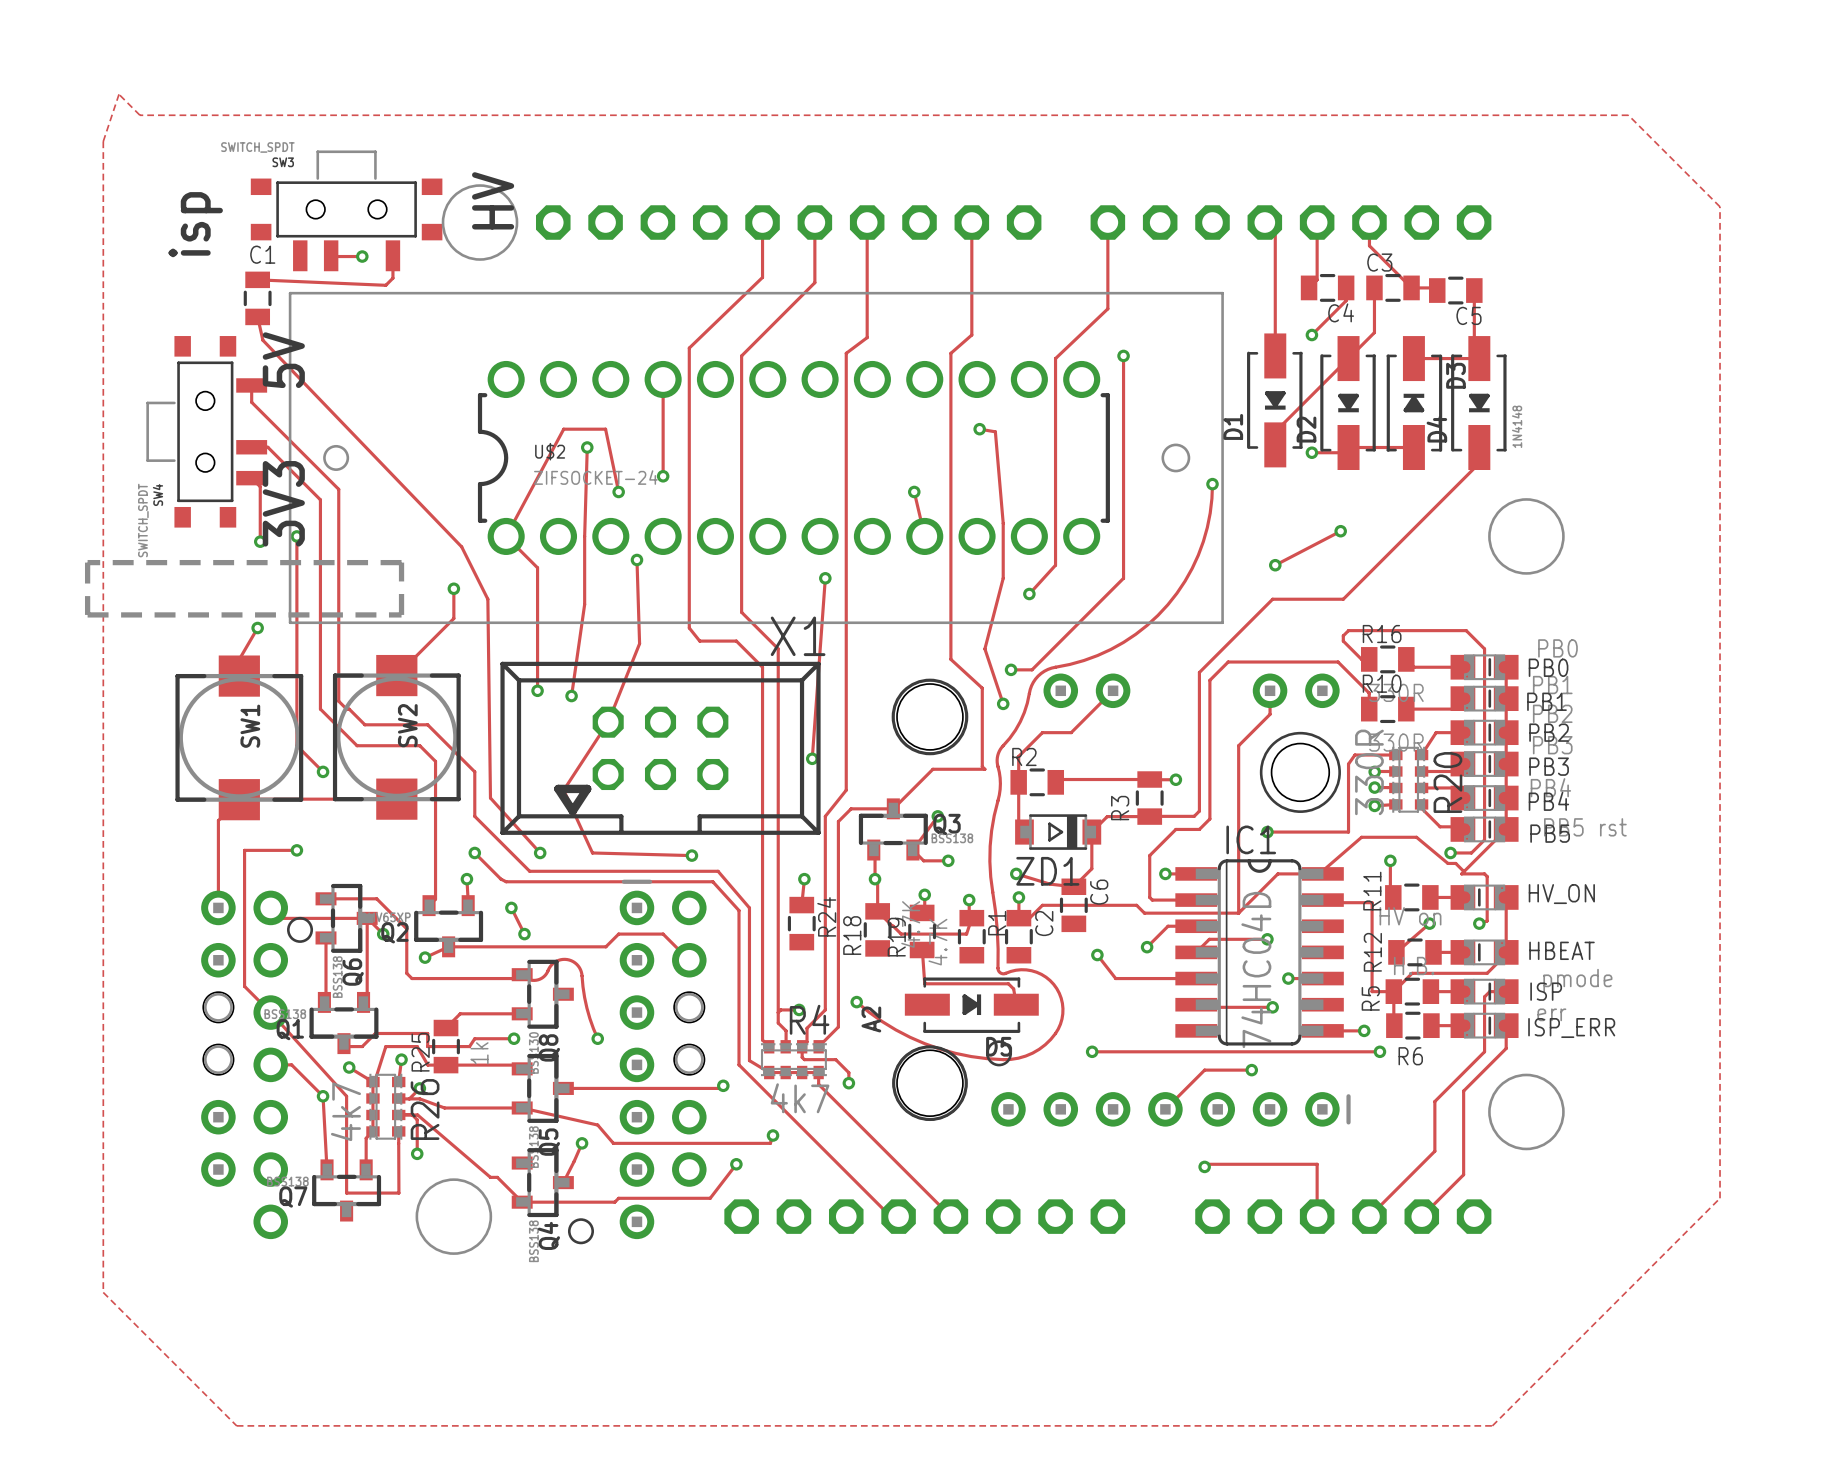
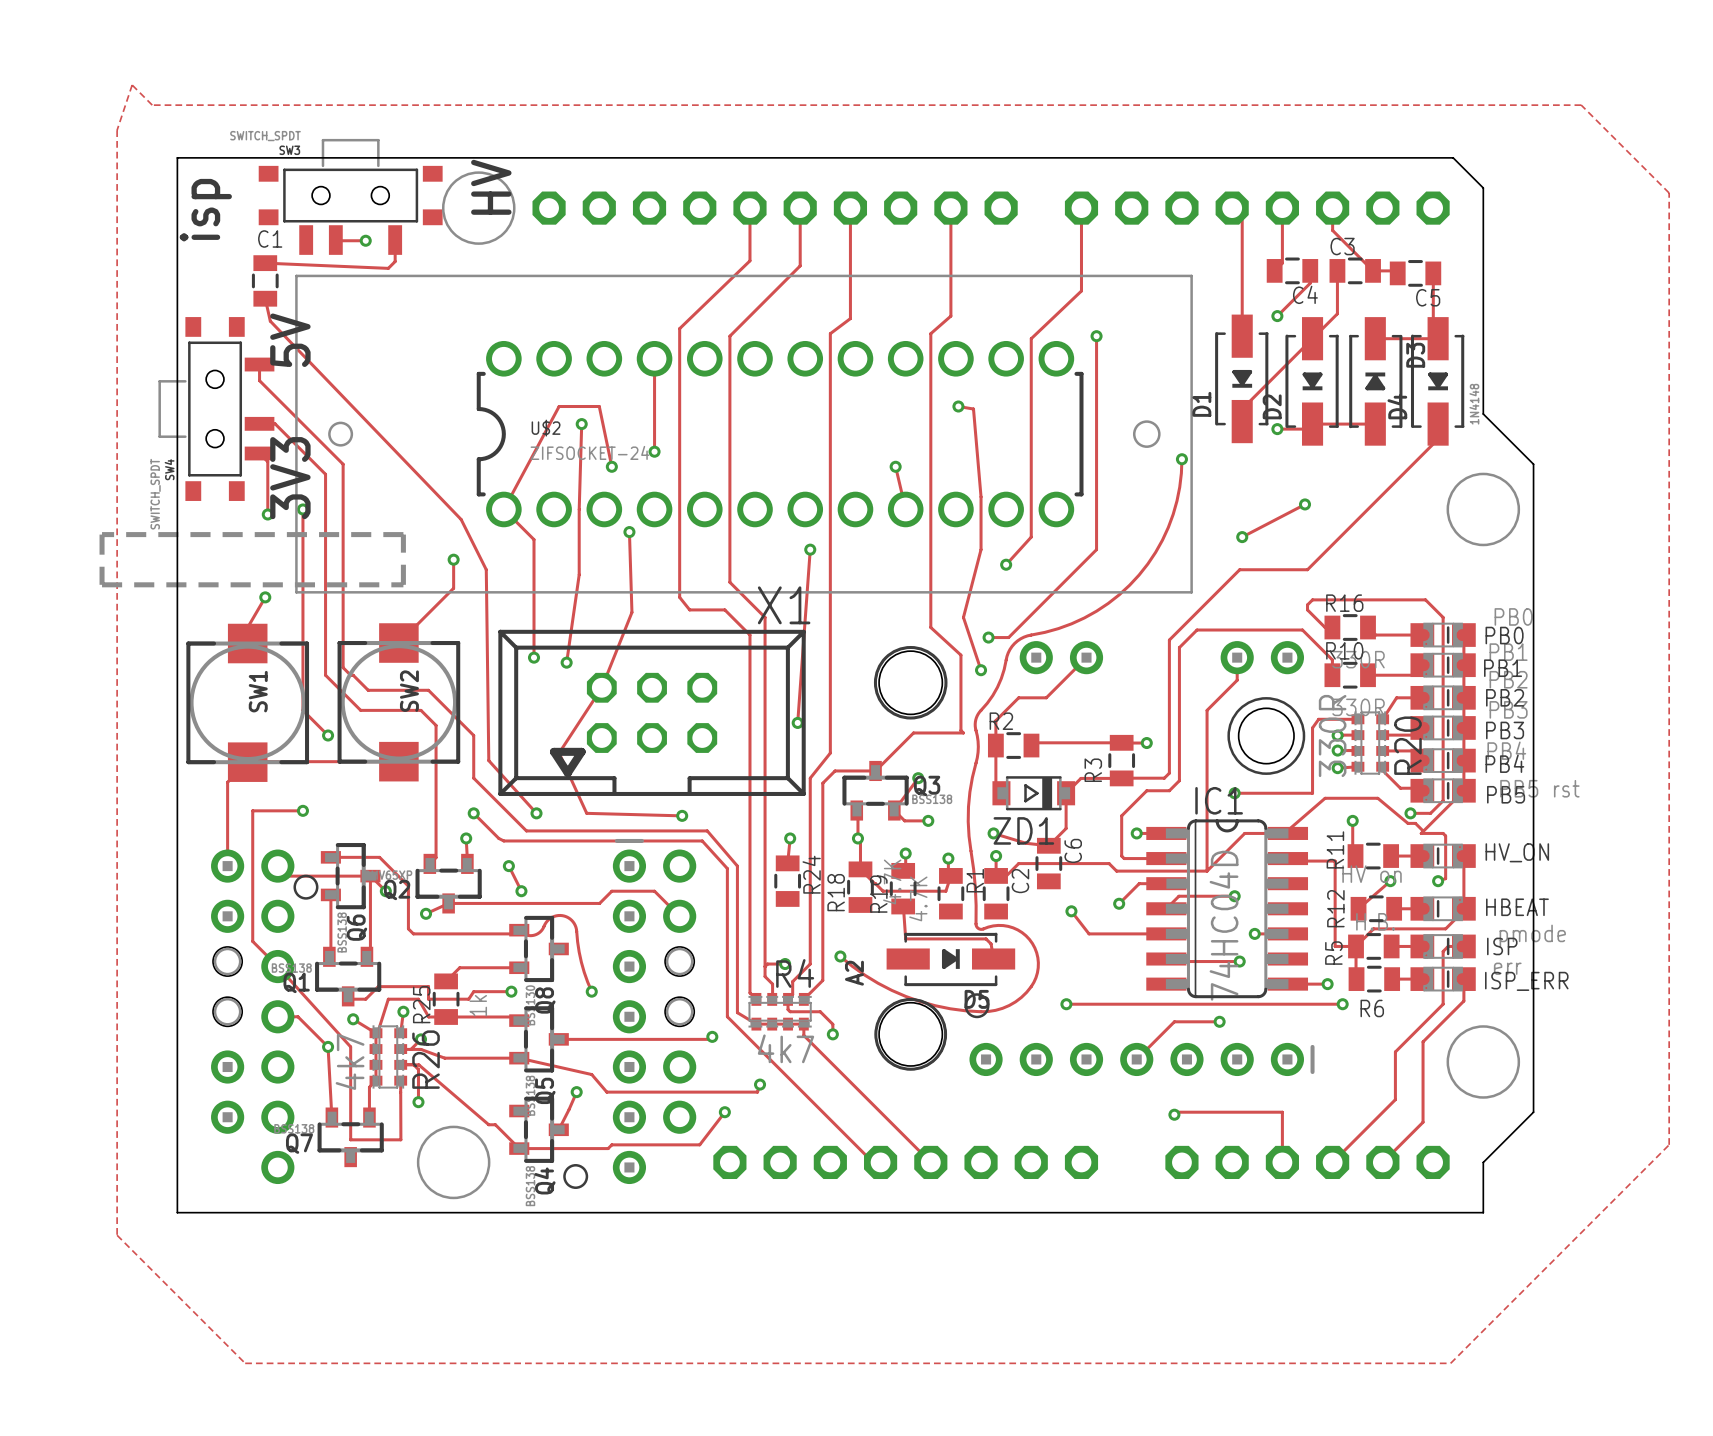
board edge: none -> (177, 157) (177, 1212) (1483, 1212) (1483, 1162) (1533, 1112) (1533, 464) (1483, 414) (1483, 188) (1453, 157) (177, 157)

